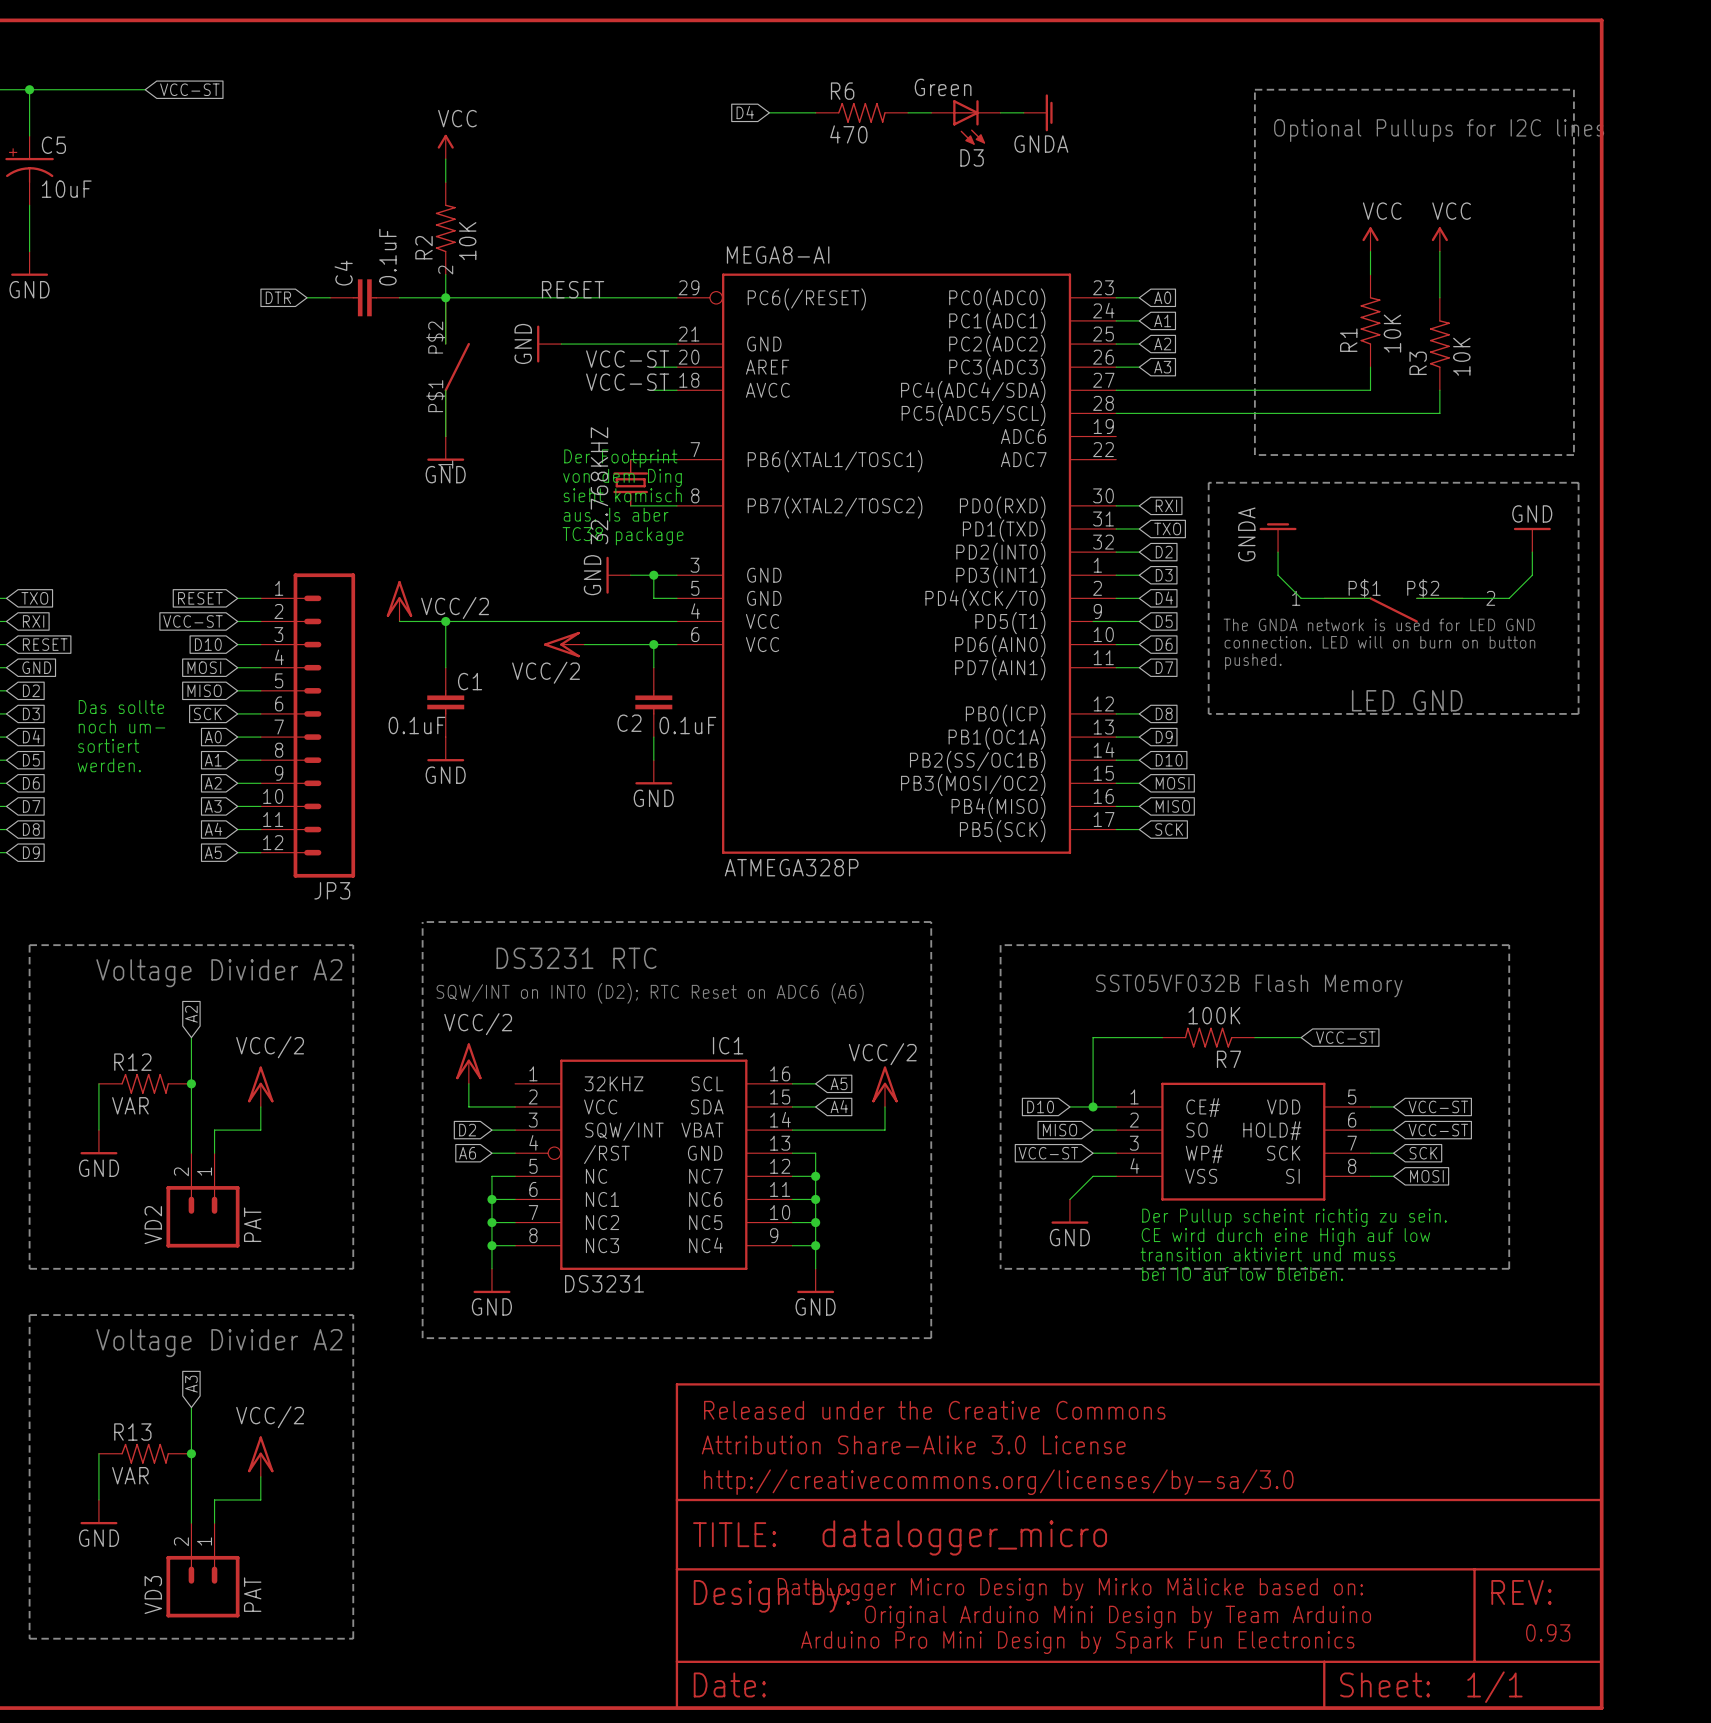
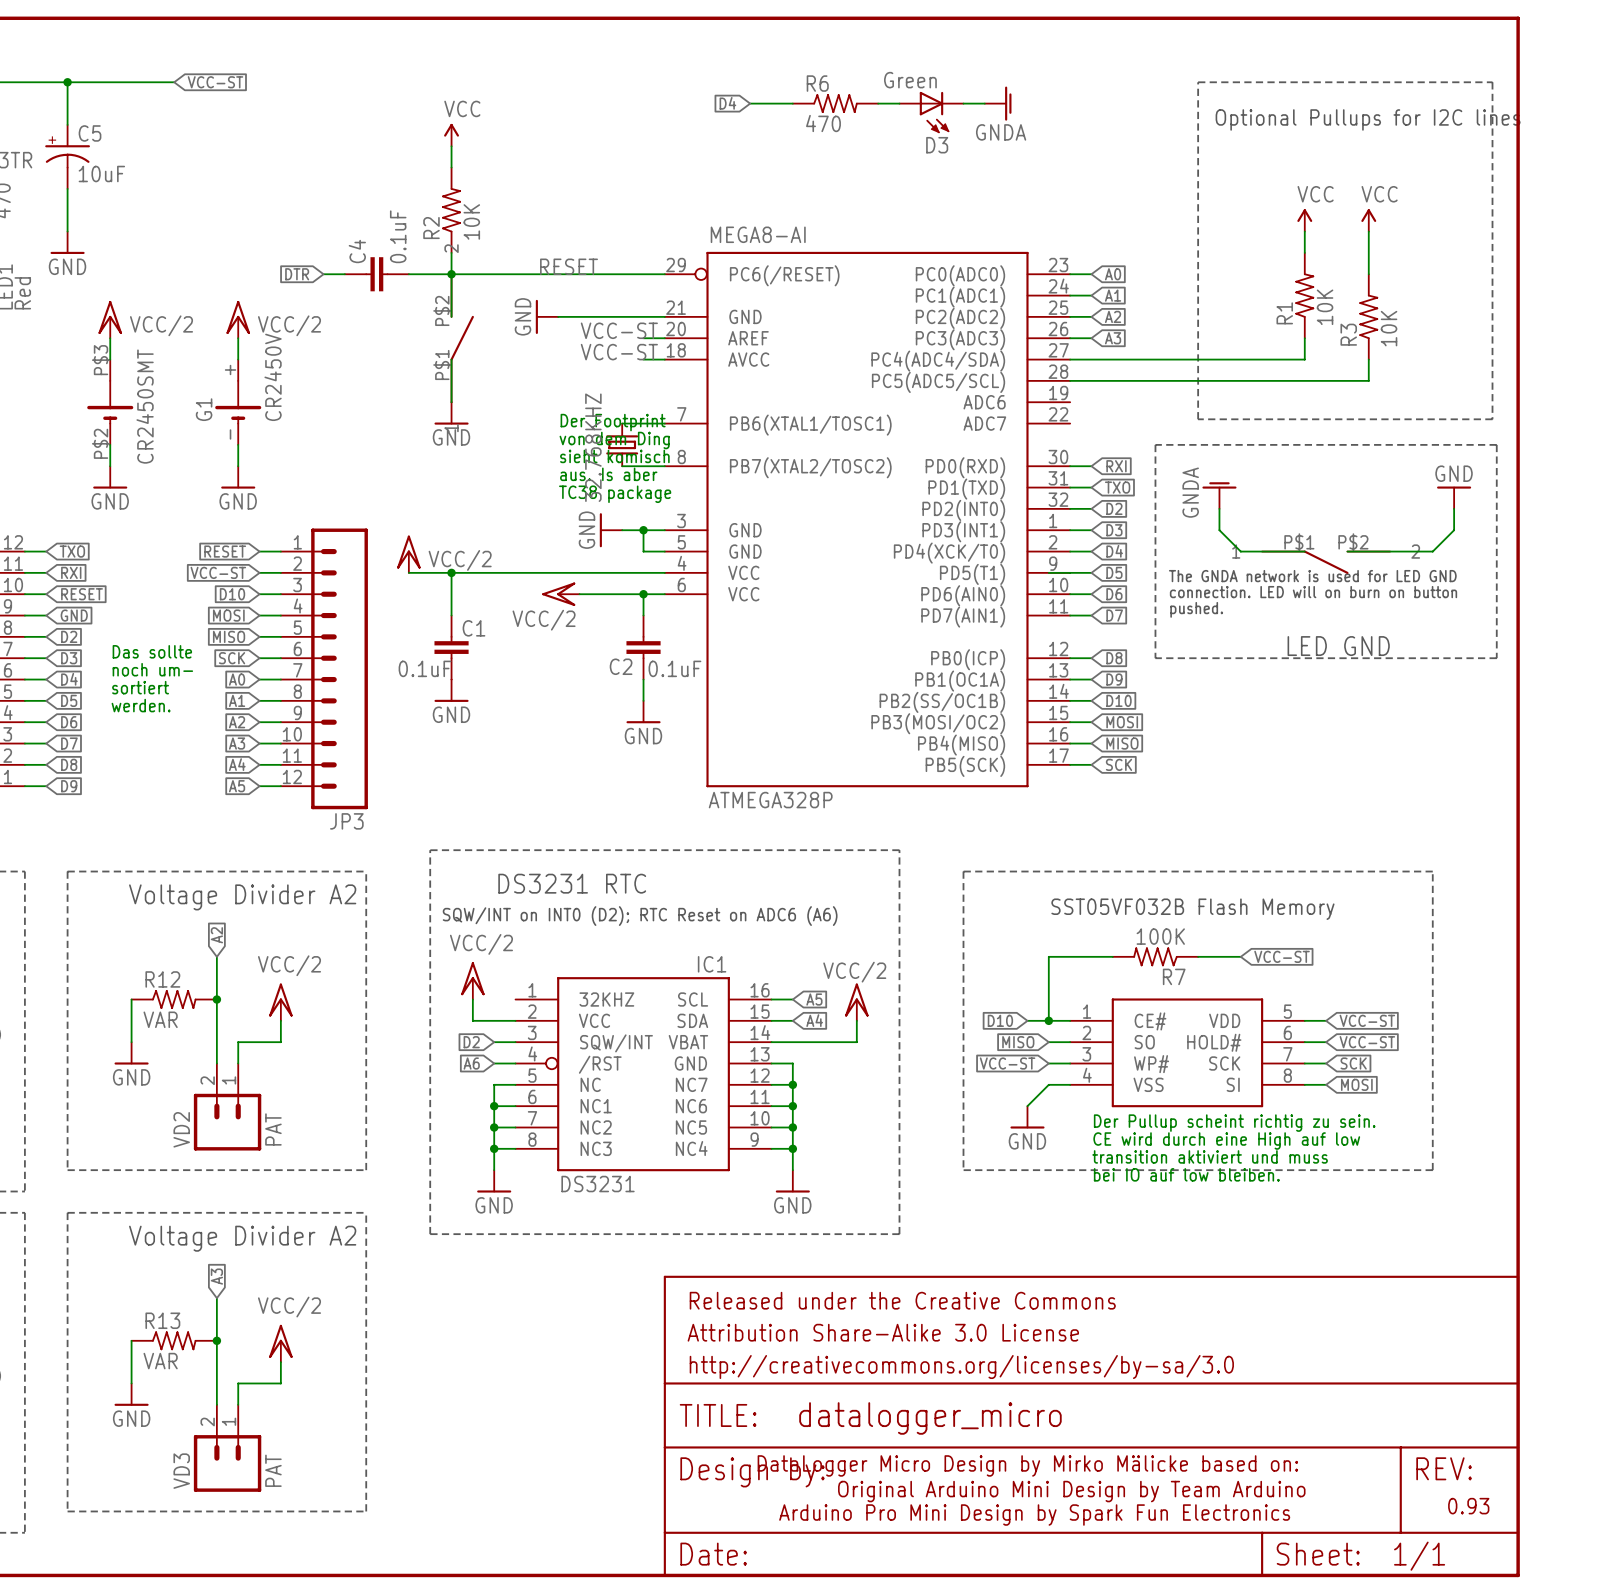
power symbol: none -> VCC/2 (110, 319)
power symbol: none -> VCC/2 (238, 319)
wire: none -> (110, 338) (110, 359)
wire: none -> (238, 338) (238, 359)
part: none -> CR2450SMT (110, 402)
G1: none -> CR2450V (238, 402)
wire: none -> (110, 444) (110, 466)
wire: none -> (238, 444) (238, 466)
power symbol: none -> GND (110, 477)
power symbol: none -> GND (238, 477)

